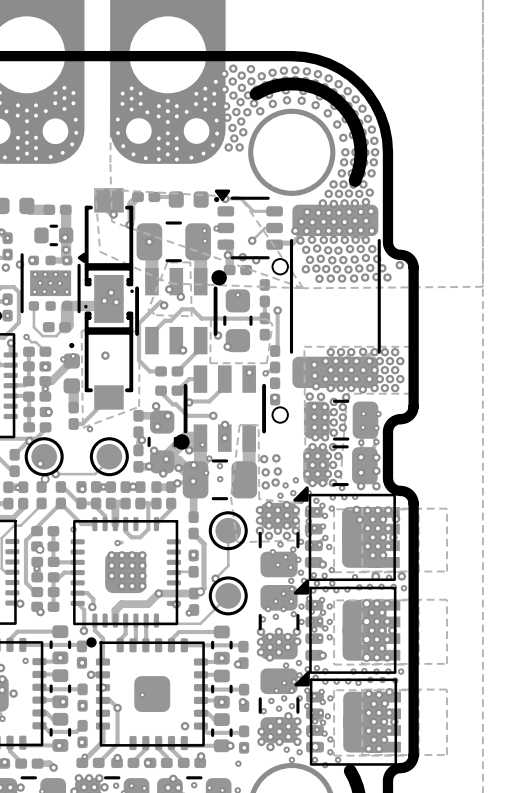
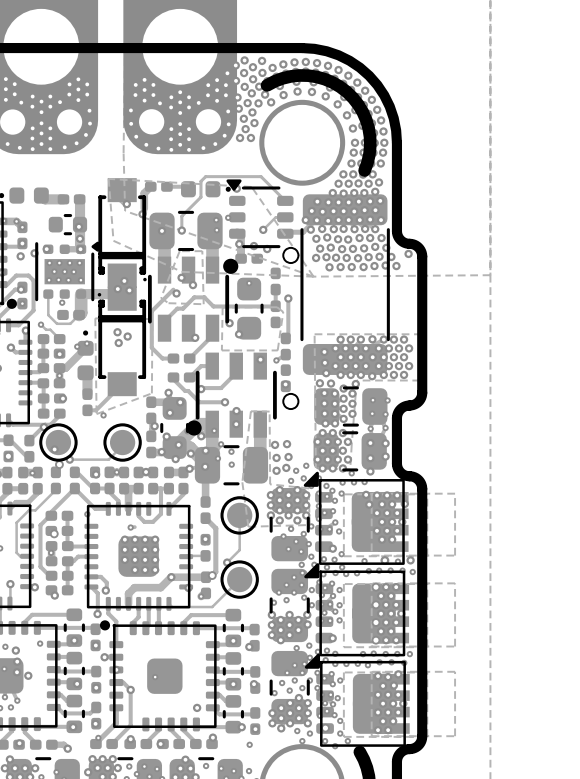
track: (225, 198) (241, 198) (253, 211) (274, 211) -> (181, 230) (181, 216) (200, 197) (200, 181) (205, 176) (261, 176) (285, 200)
via: none -> (181, 230)
via: none -> (62, 302)
via: none -> (117, 332)
via: none -> (127, 336)
via: (376, 486) -> none

